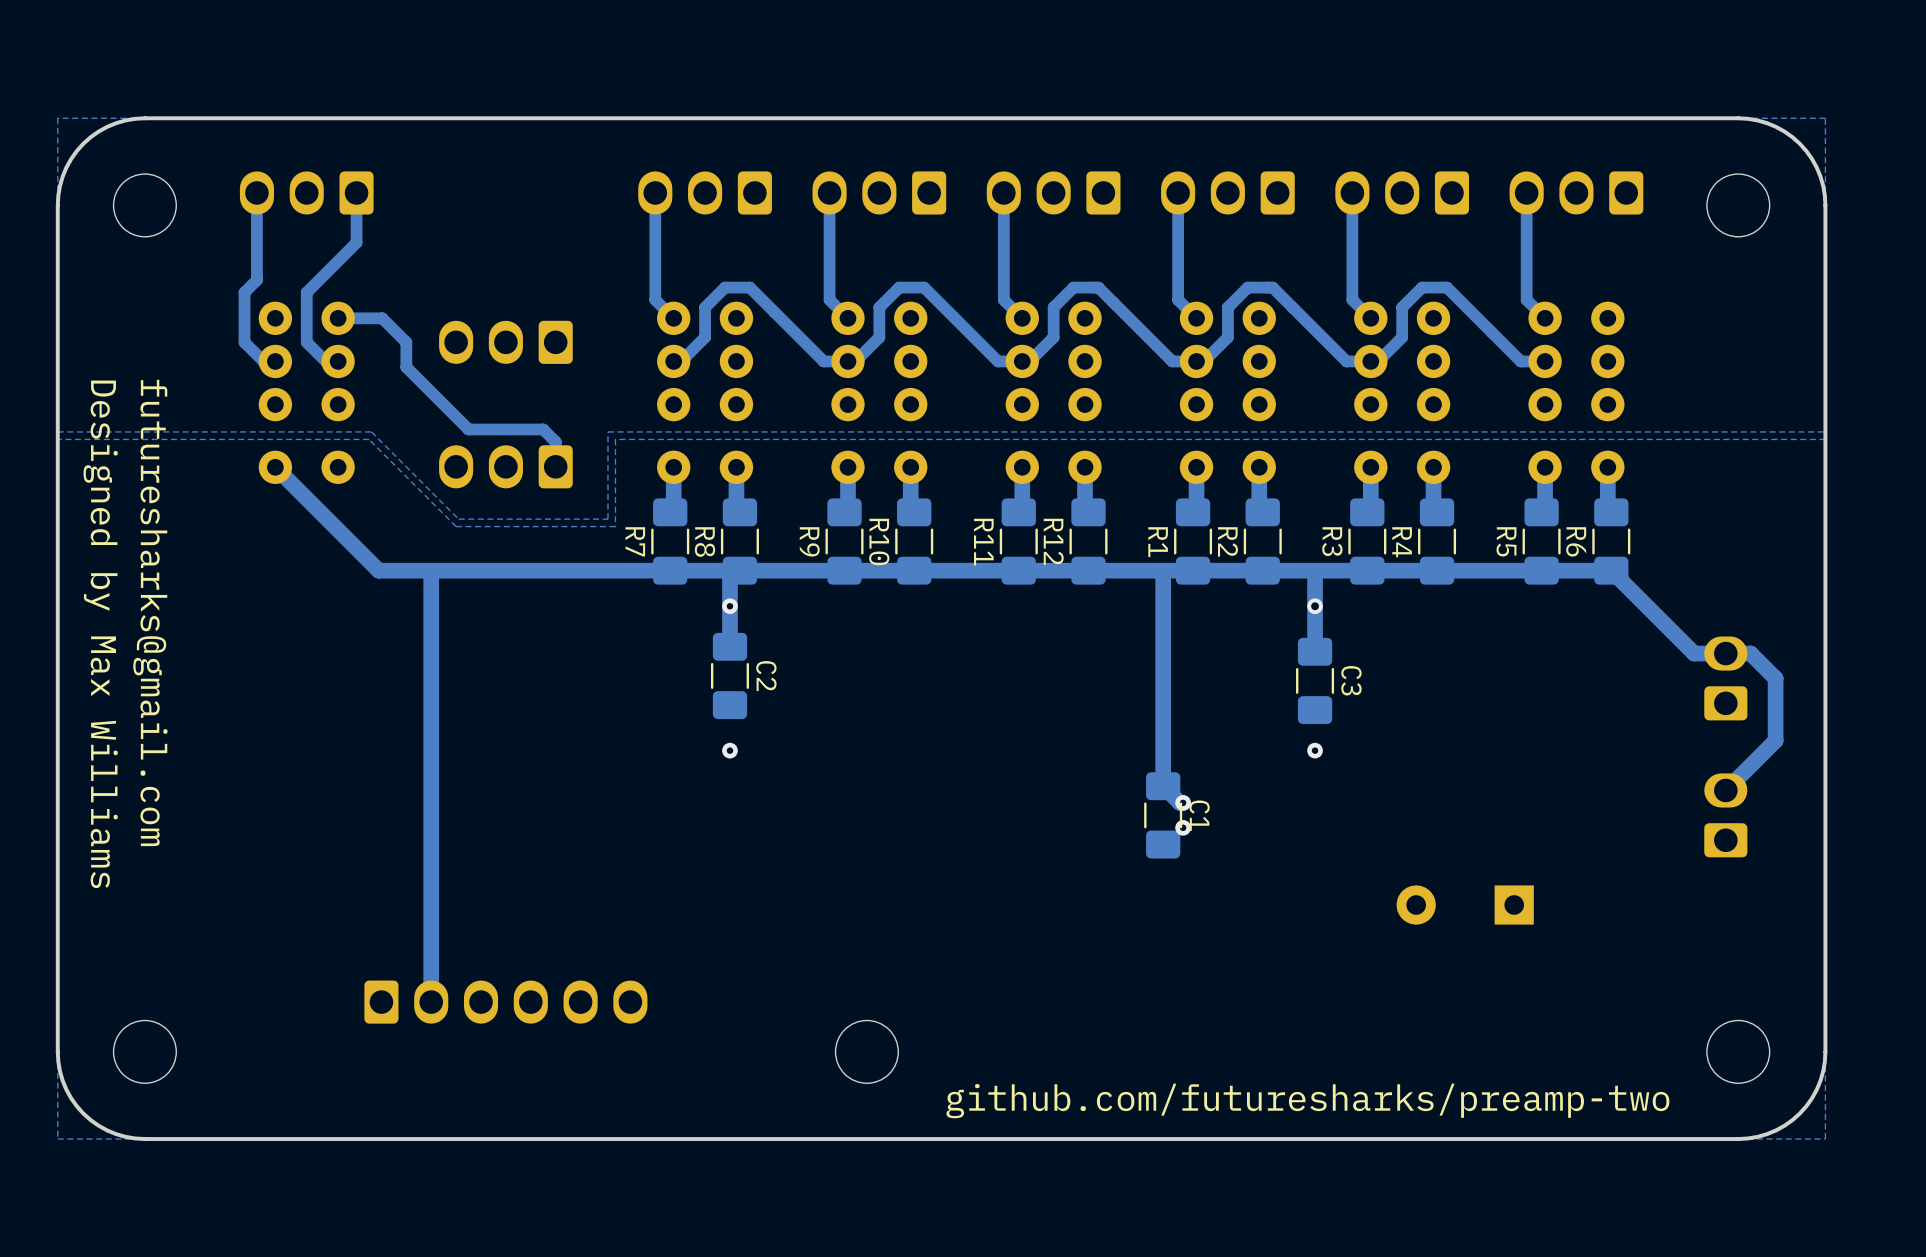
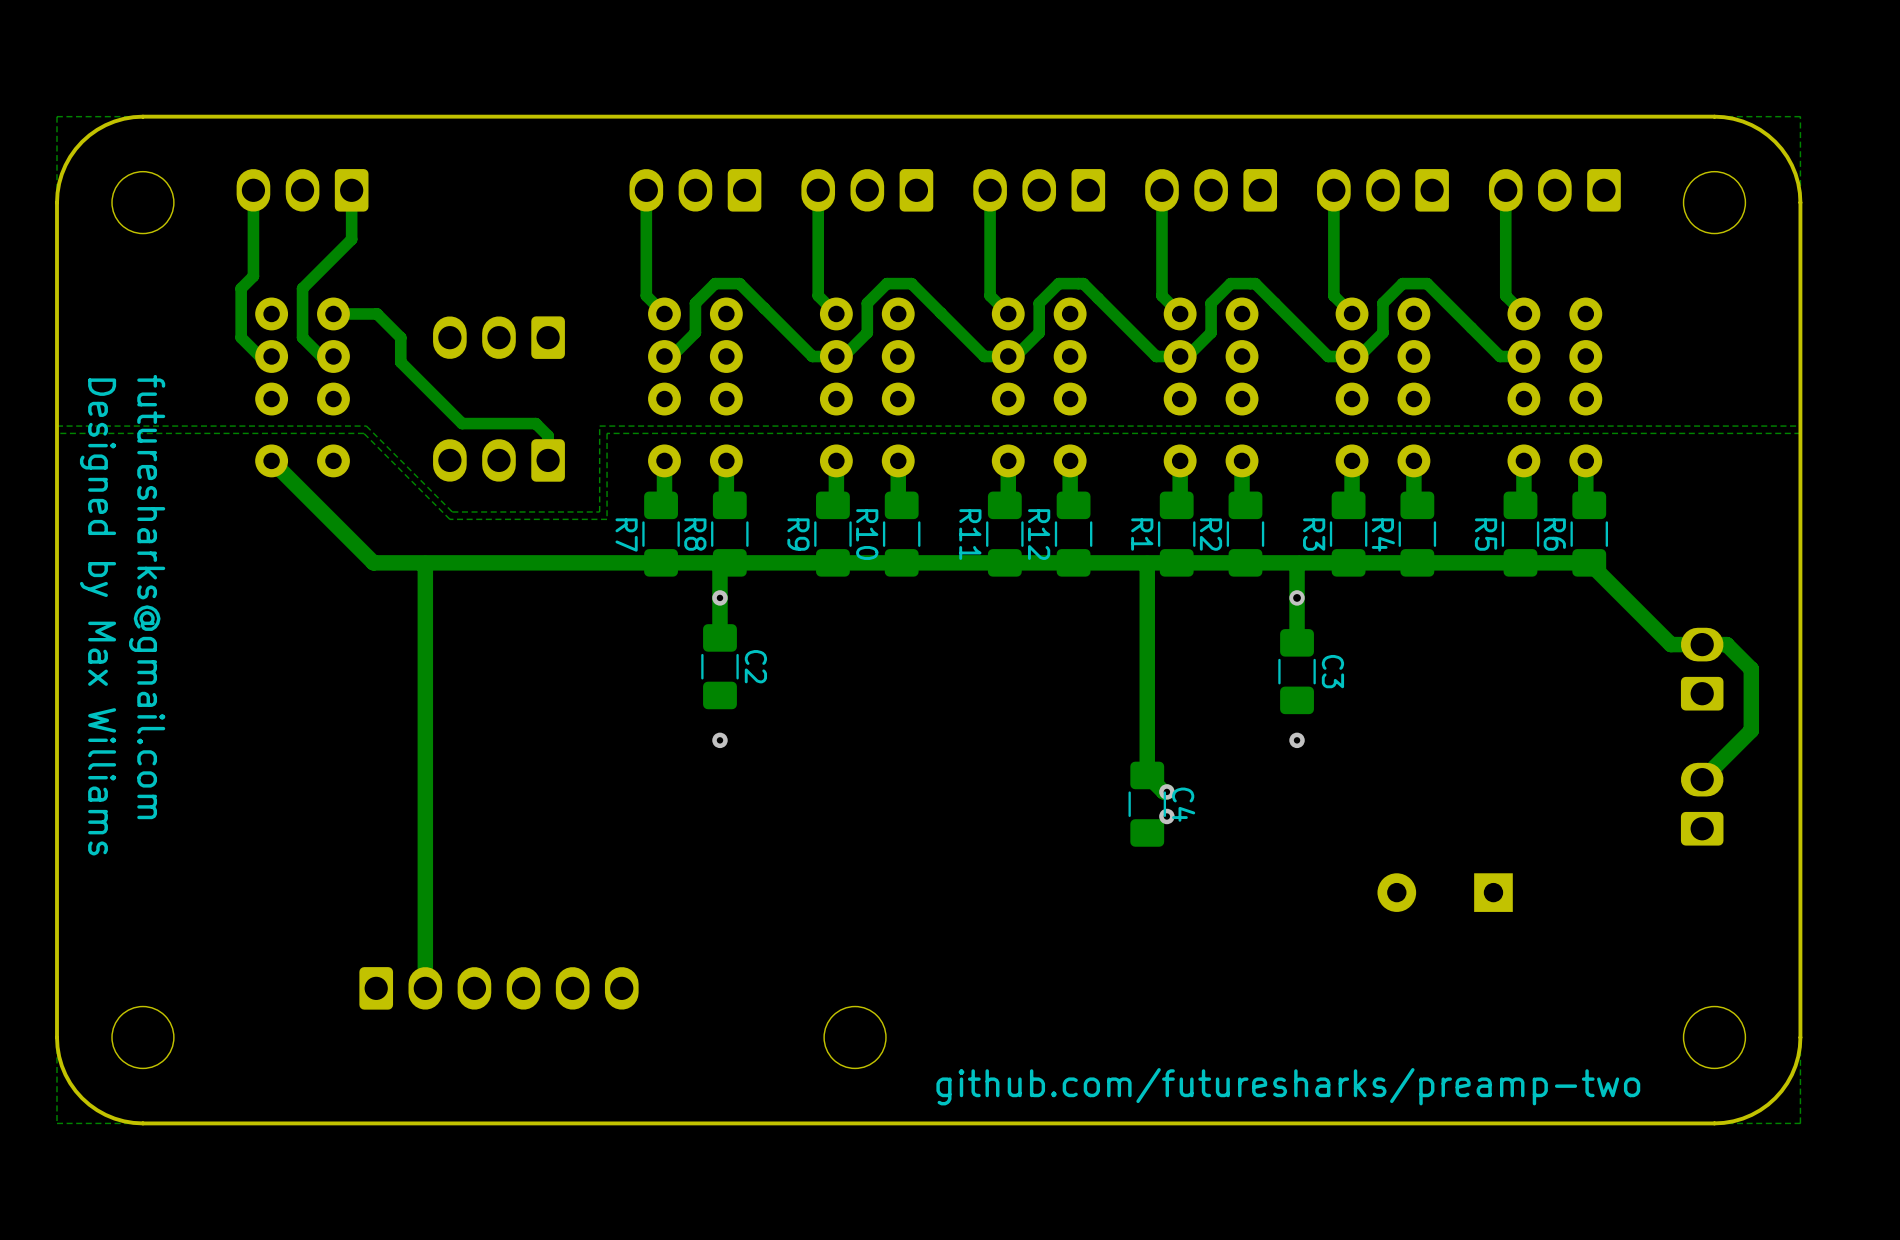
C1 name: C1 (1199, 815) -> C4 (1183, 804)

